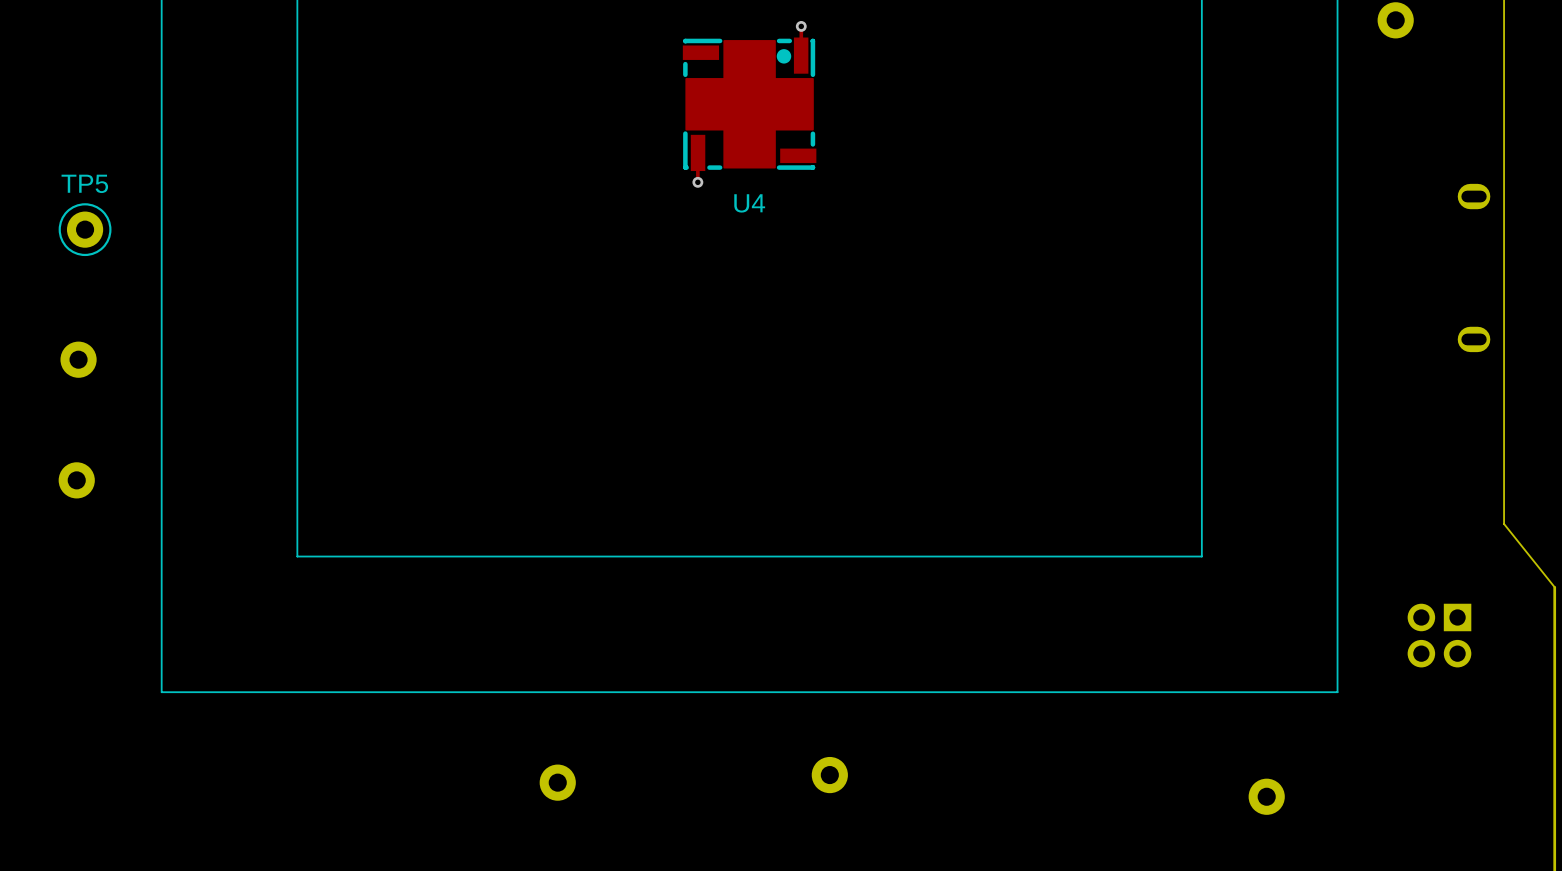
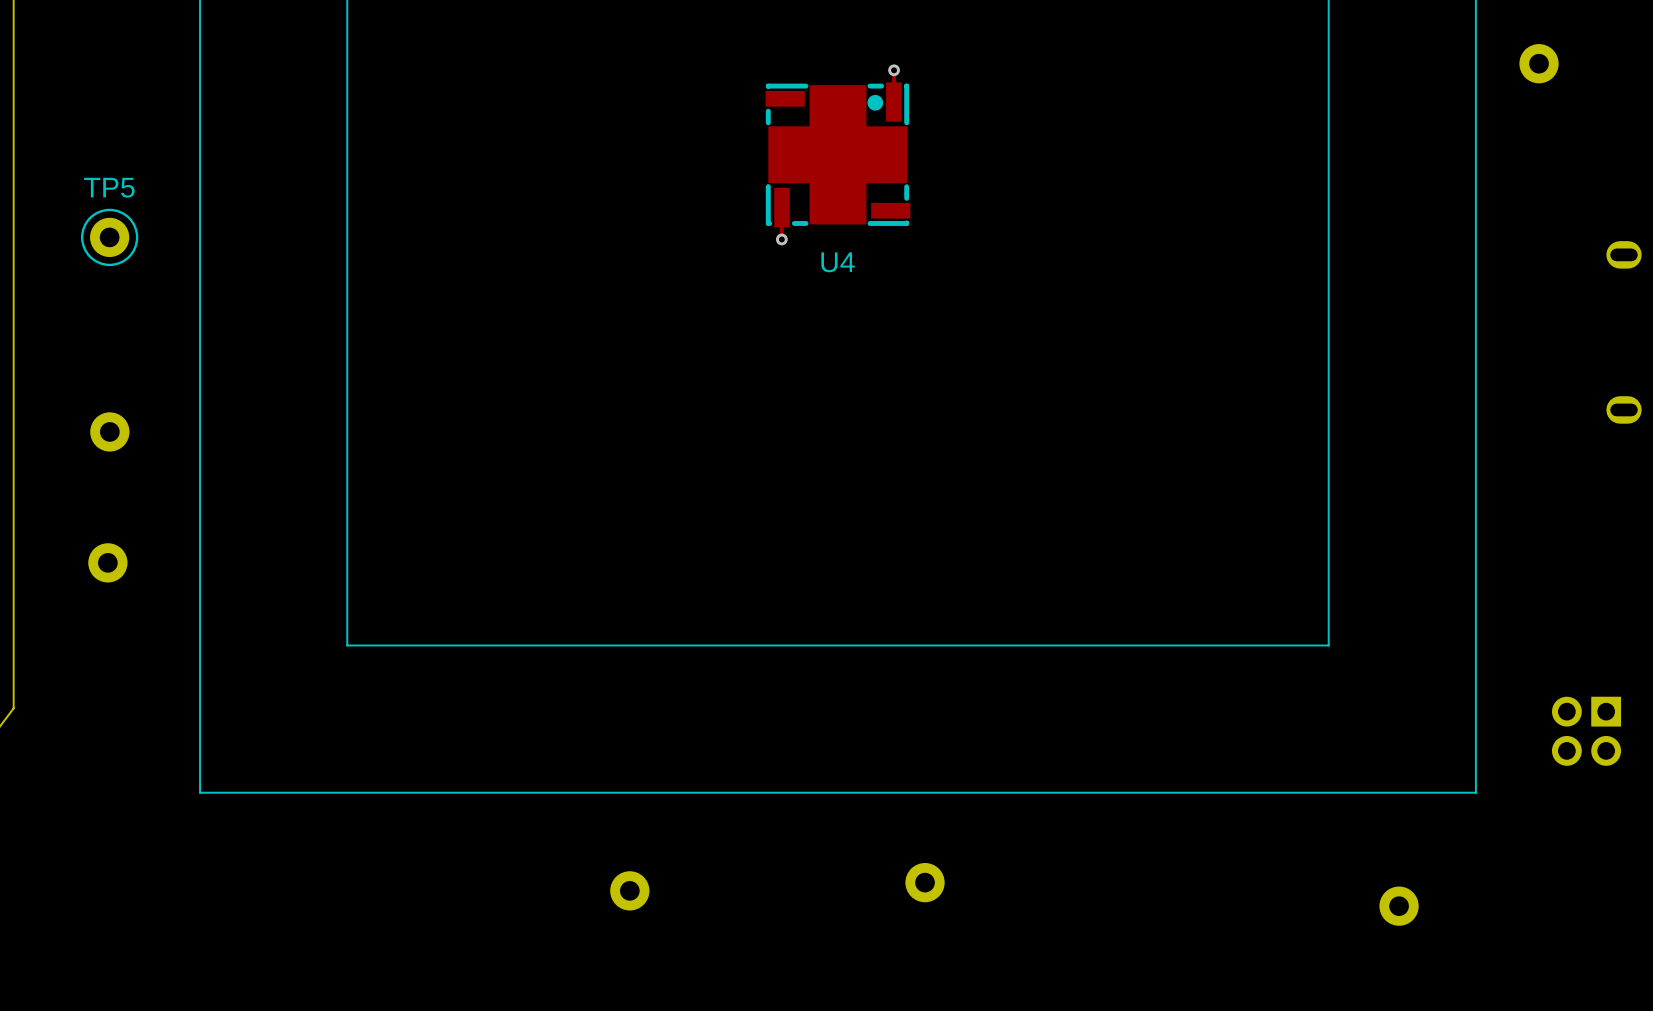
TP5 position: (85, 229) -> (109, 237)

